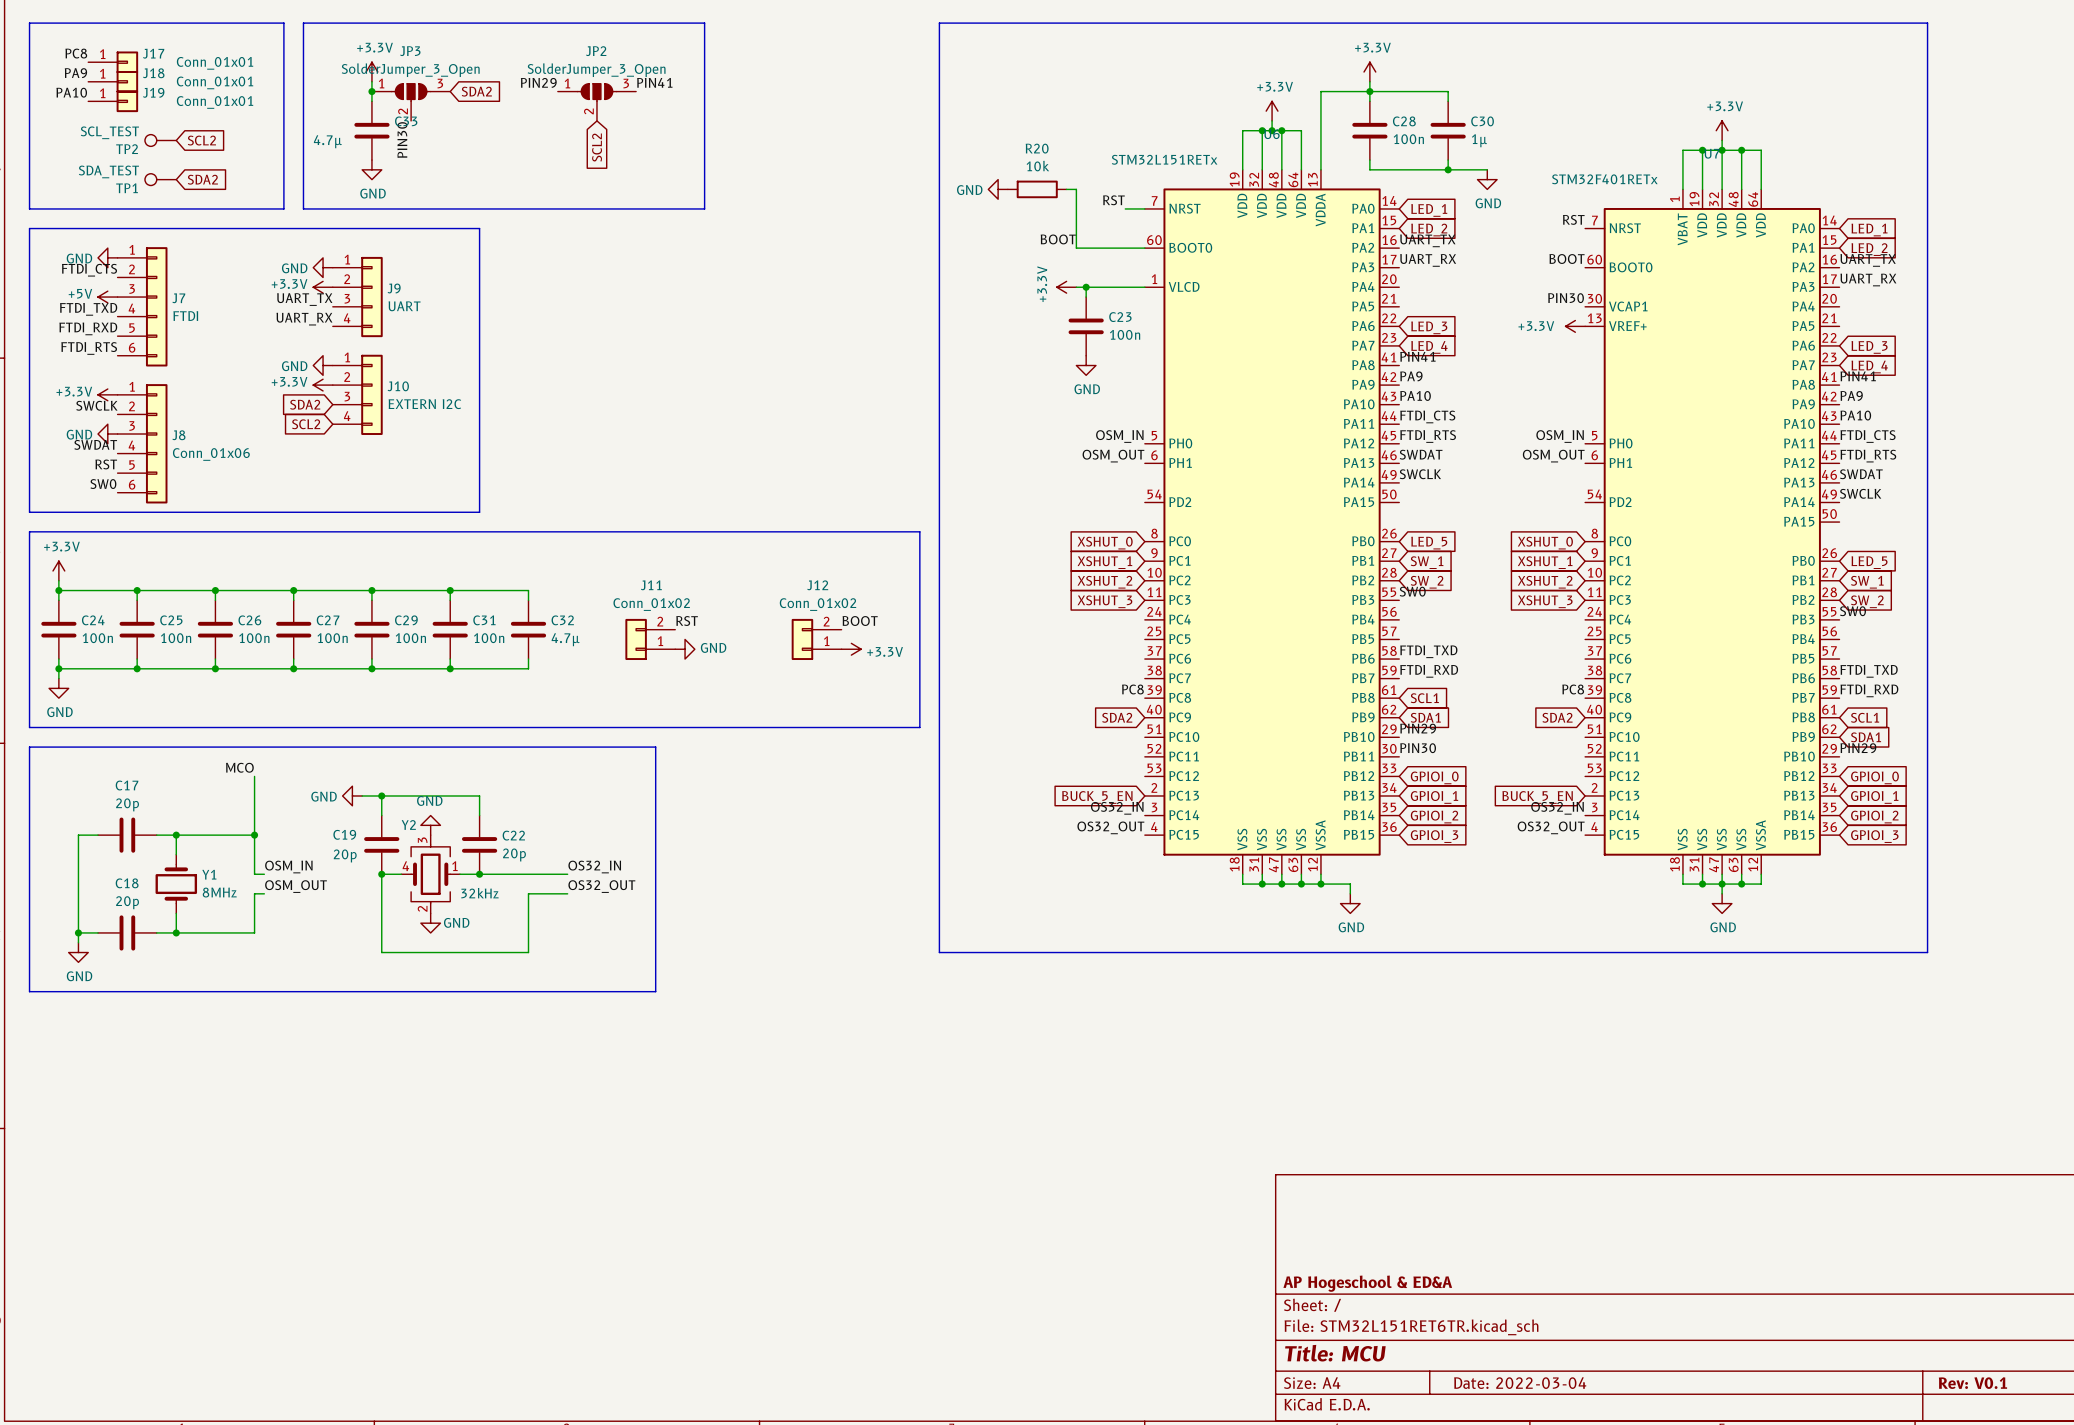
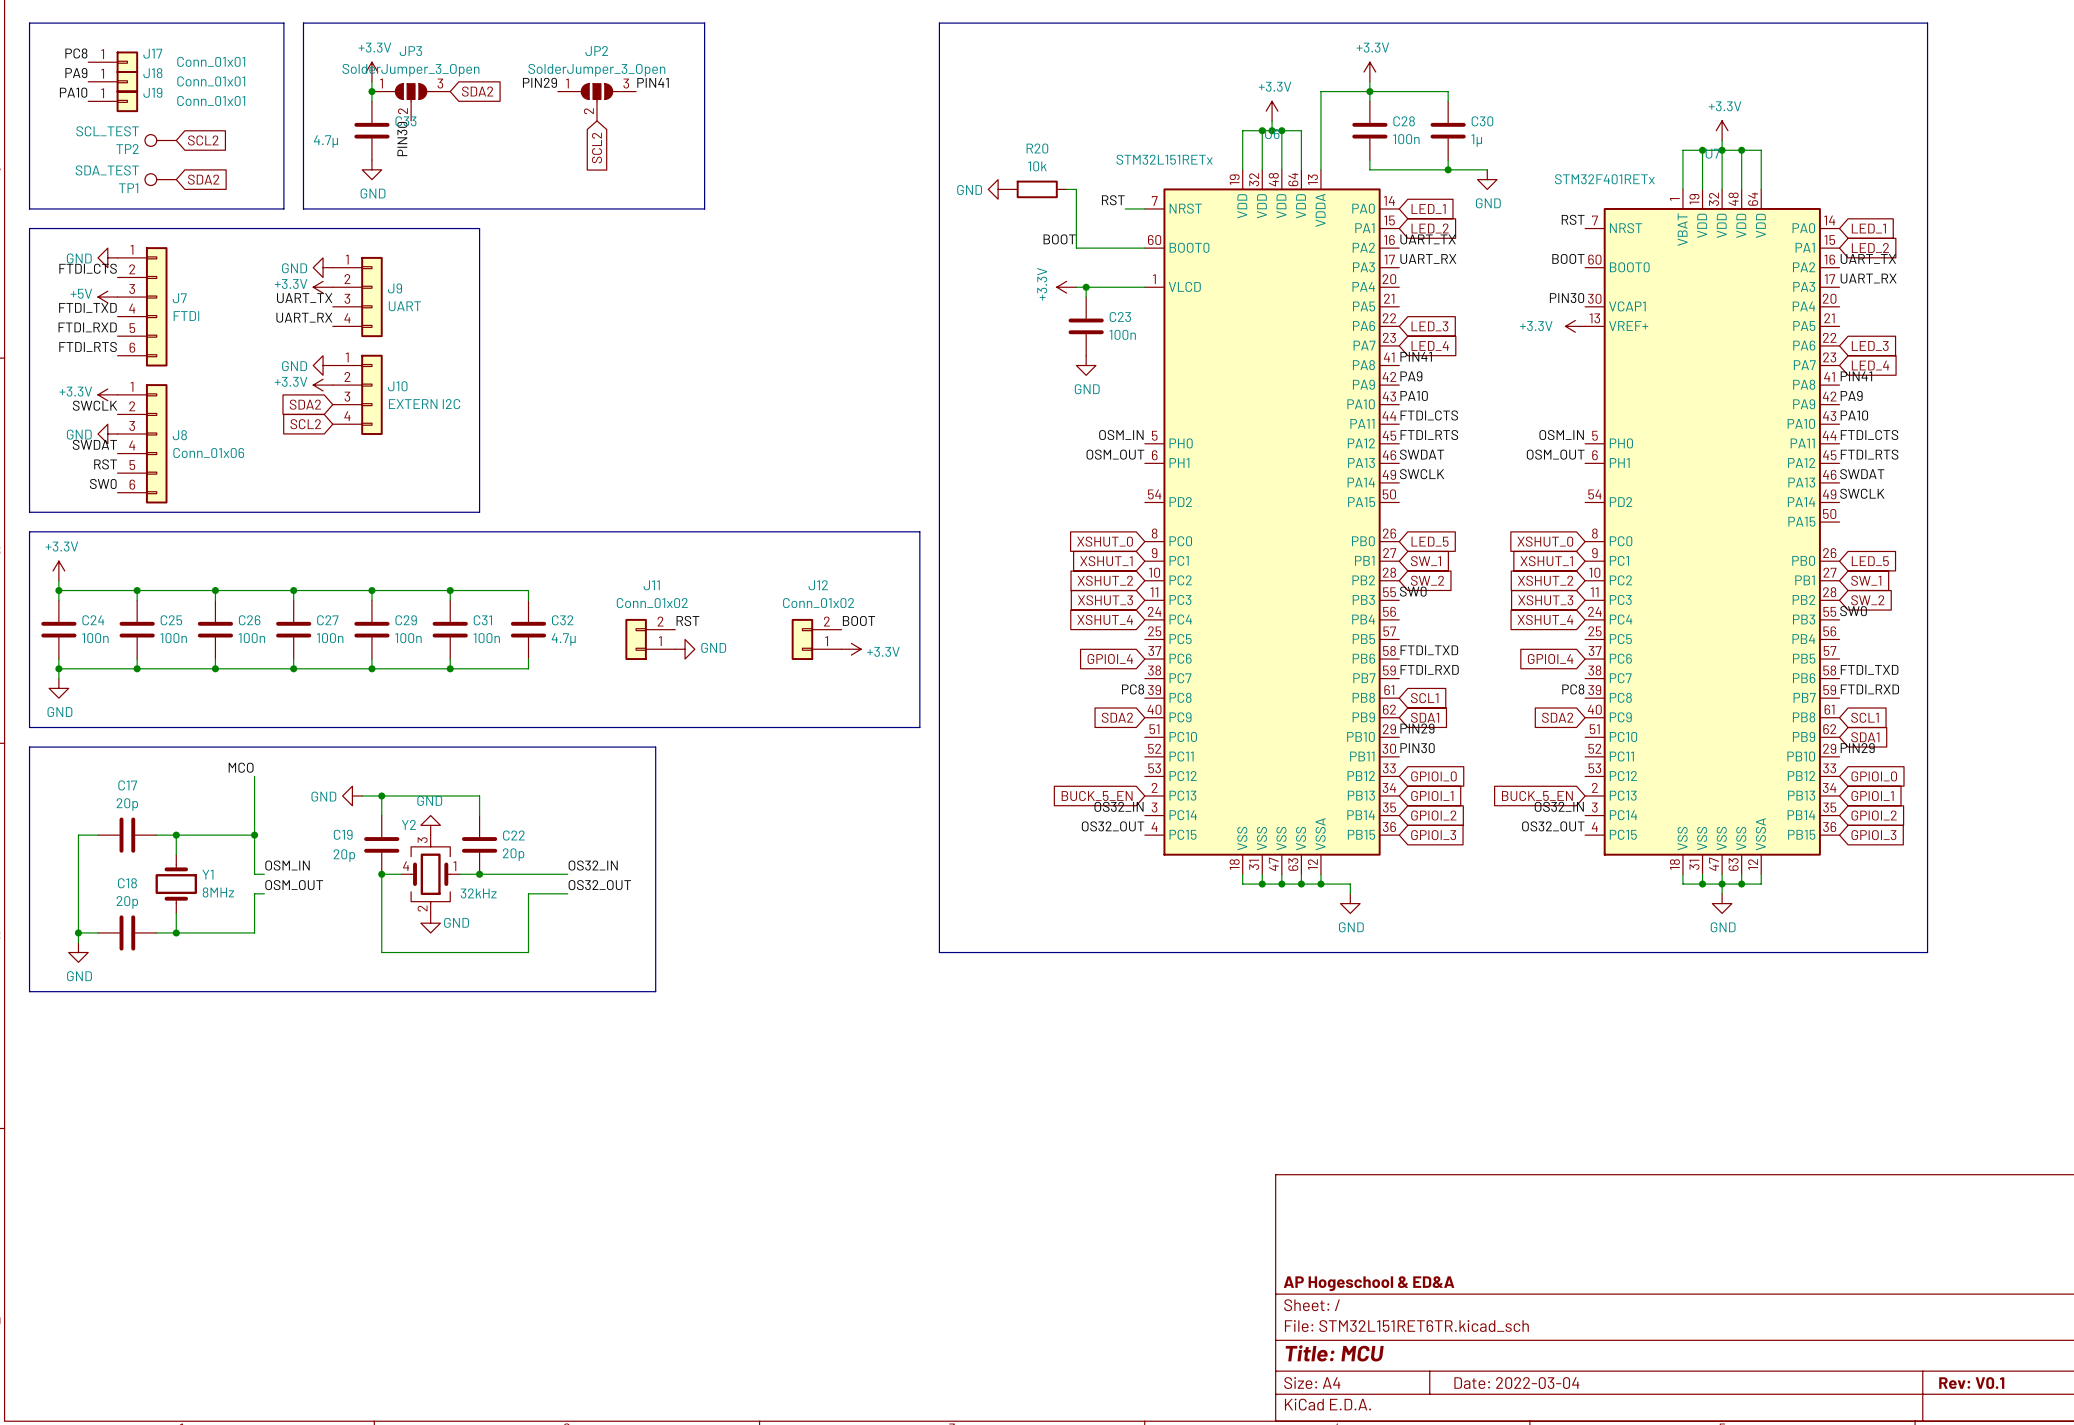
global label: none -> XSHUT_4 (1105, 619)
global label: none -> XSHUT_4 (1545, 619)
global label: none -> GPIOI_4 (1110, 659)
global label: none -> GPIOI_4 (1550, 659)

